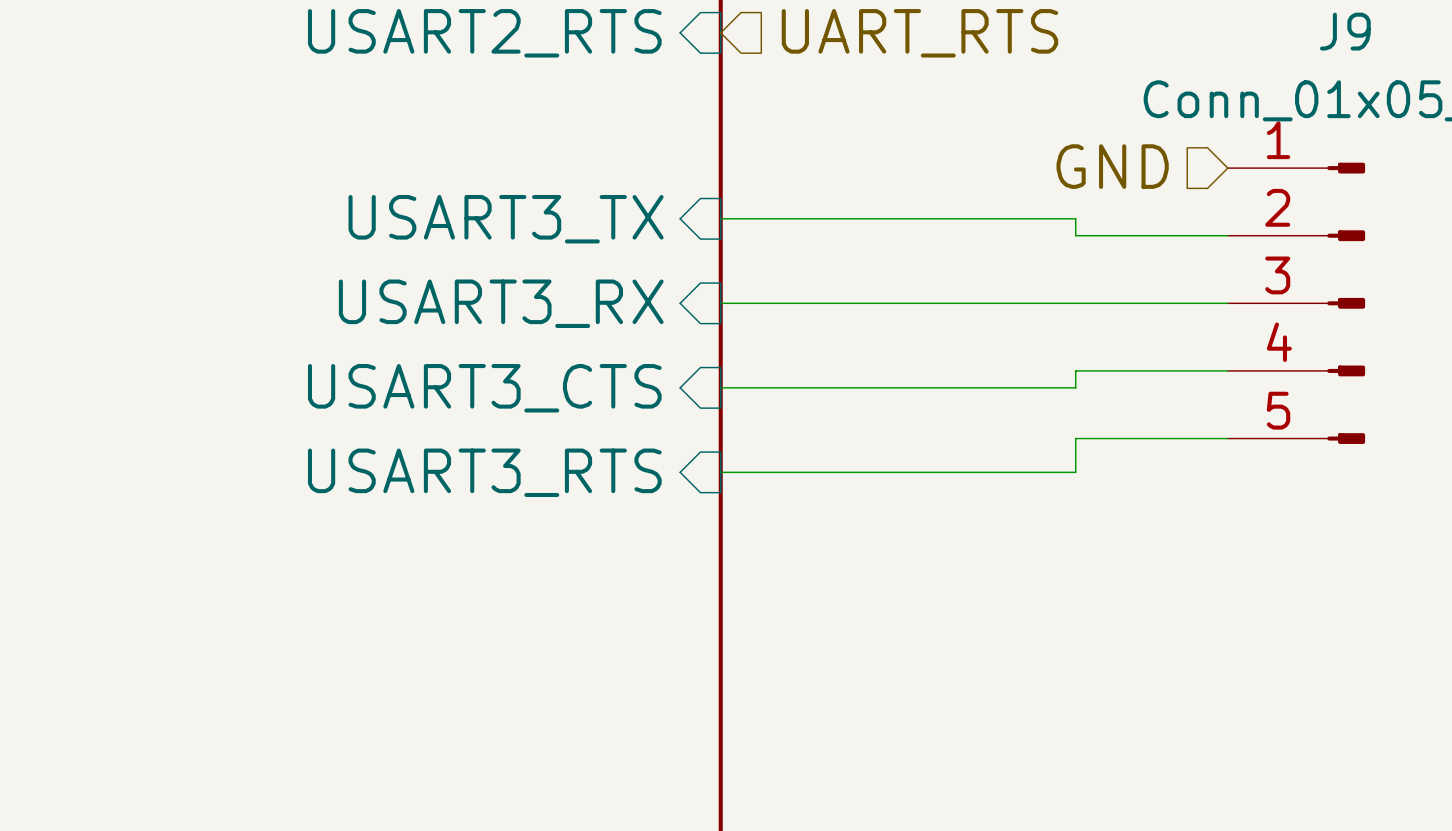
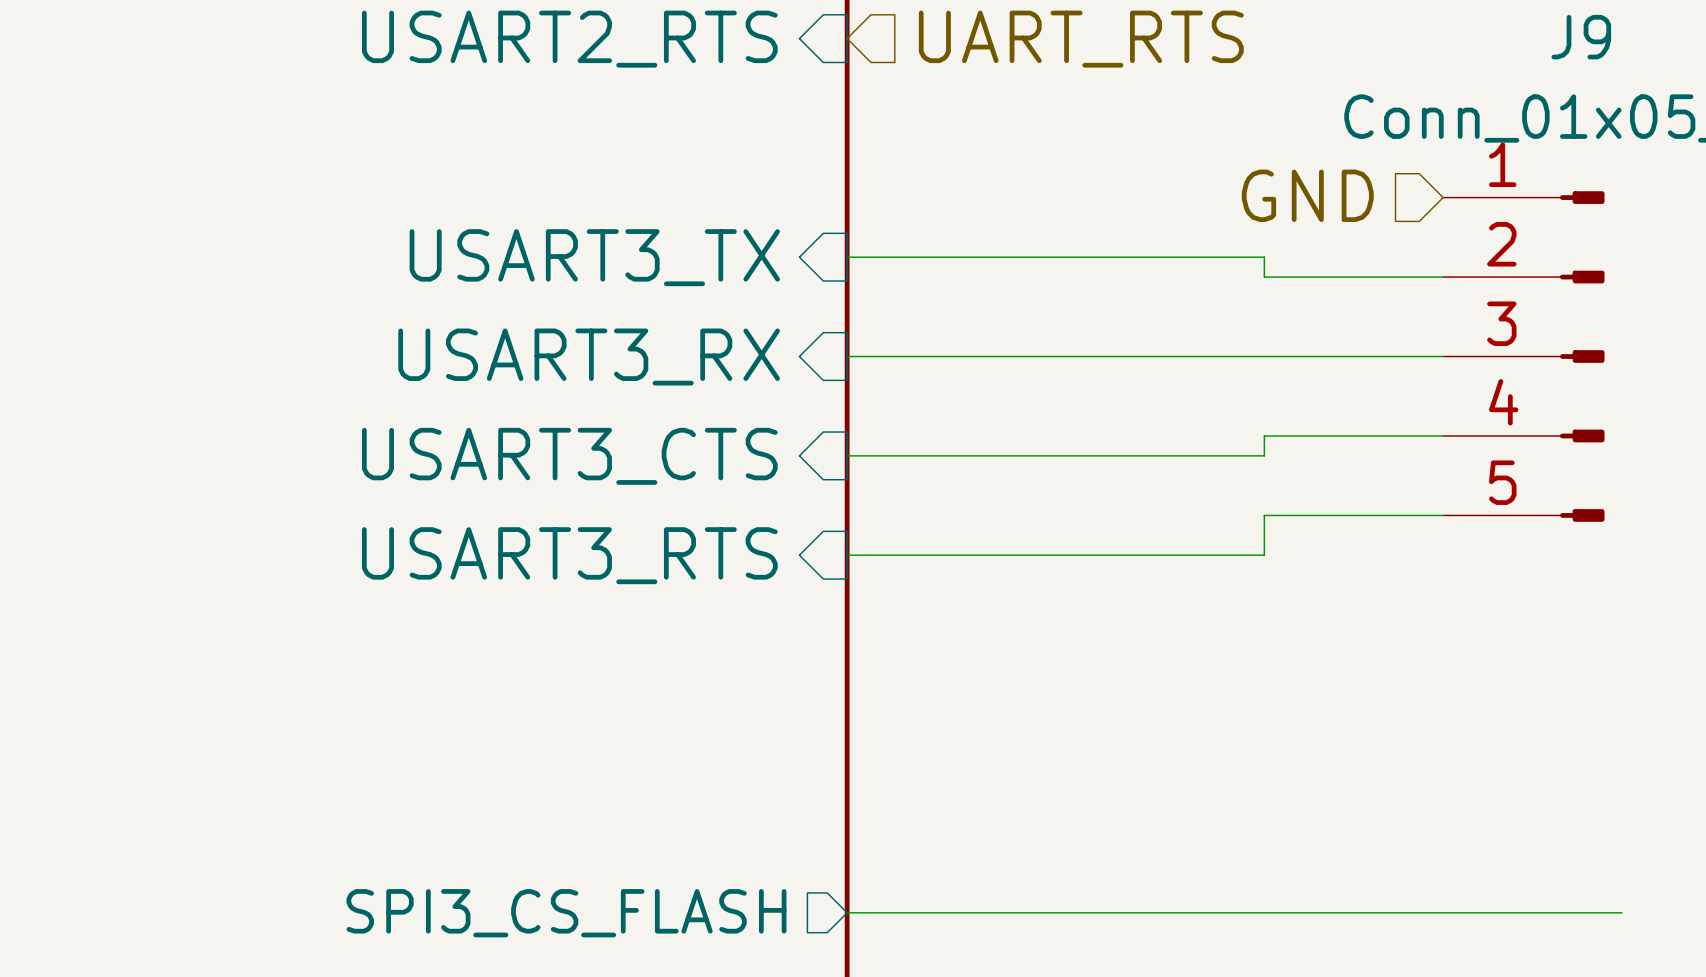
sheet pin: none -> SPI3_CS_FLASH (566, 913)
wire: none -> (847, 912) (1621, 912)

